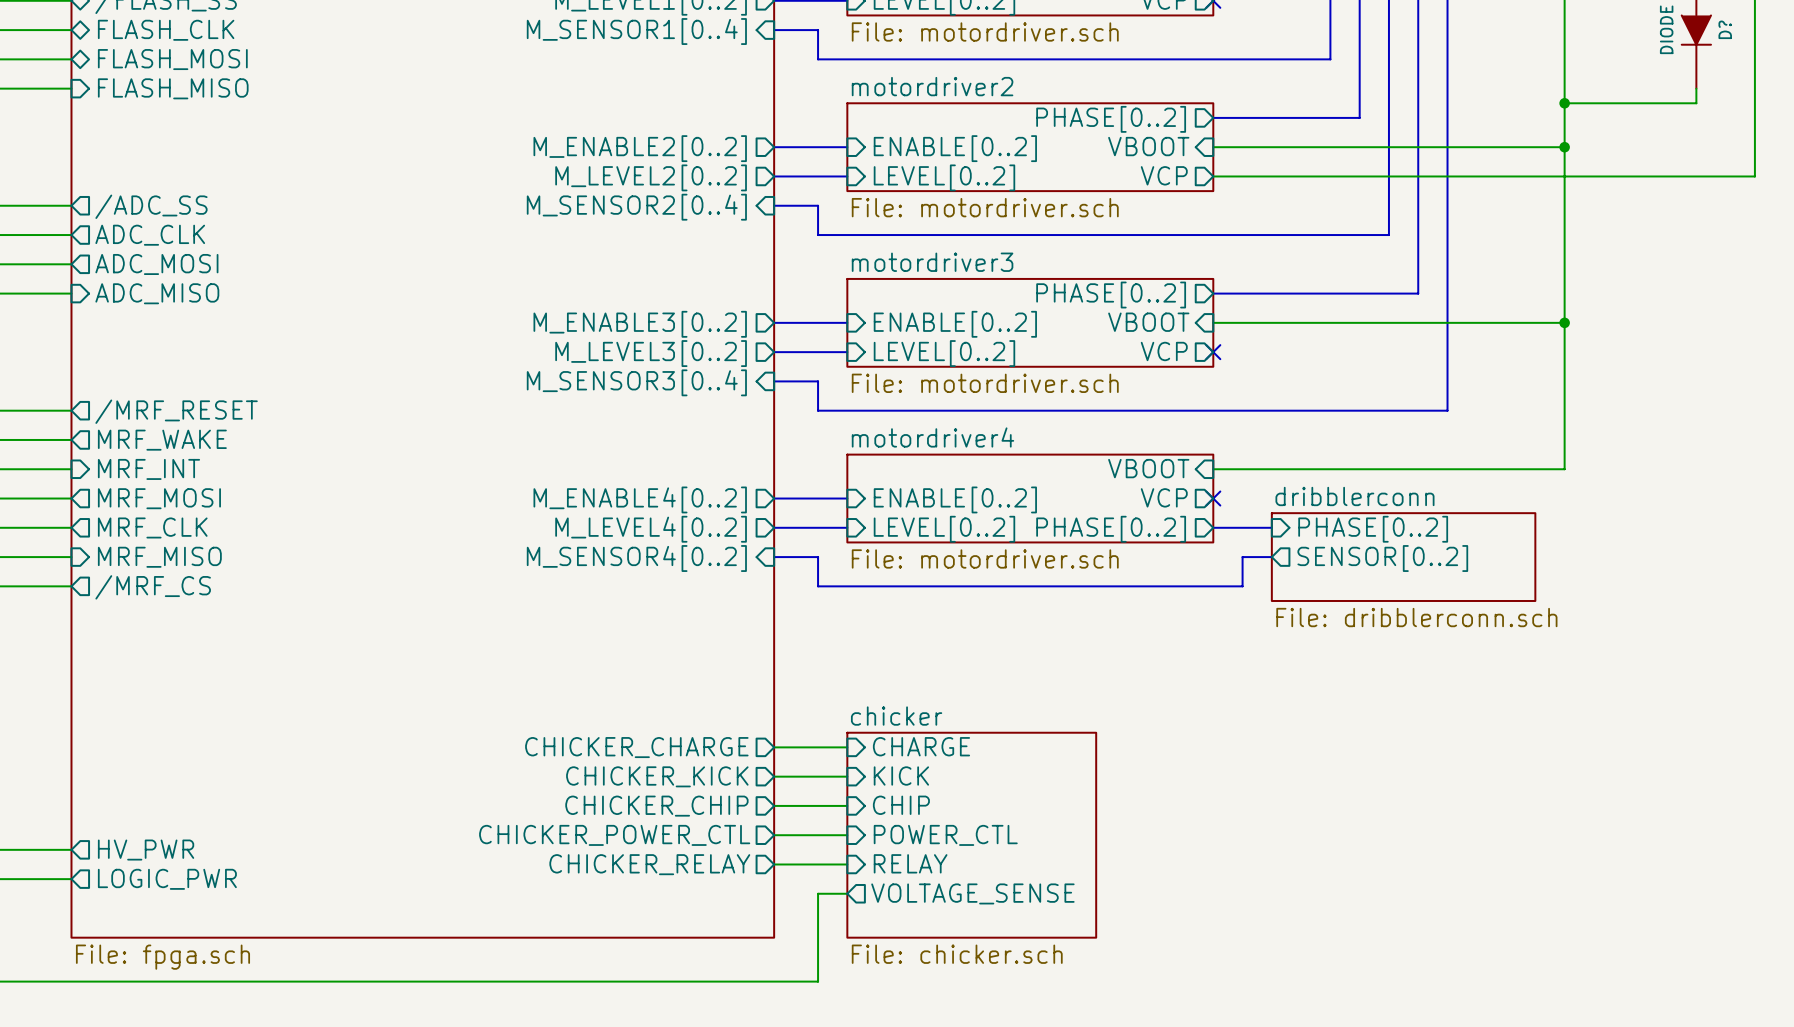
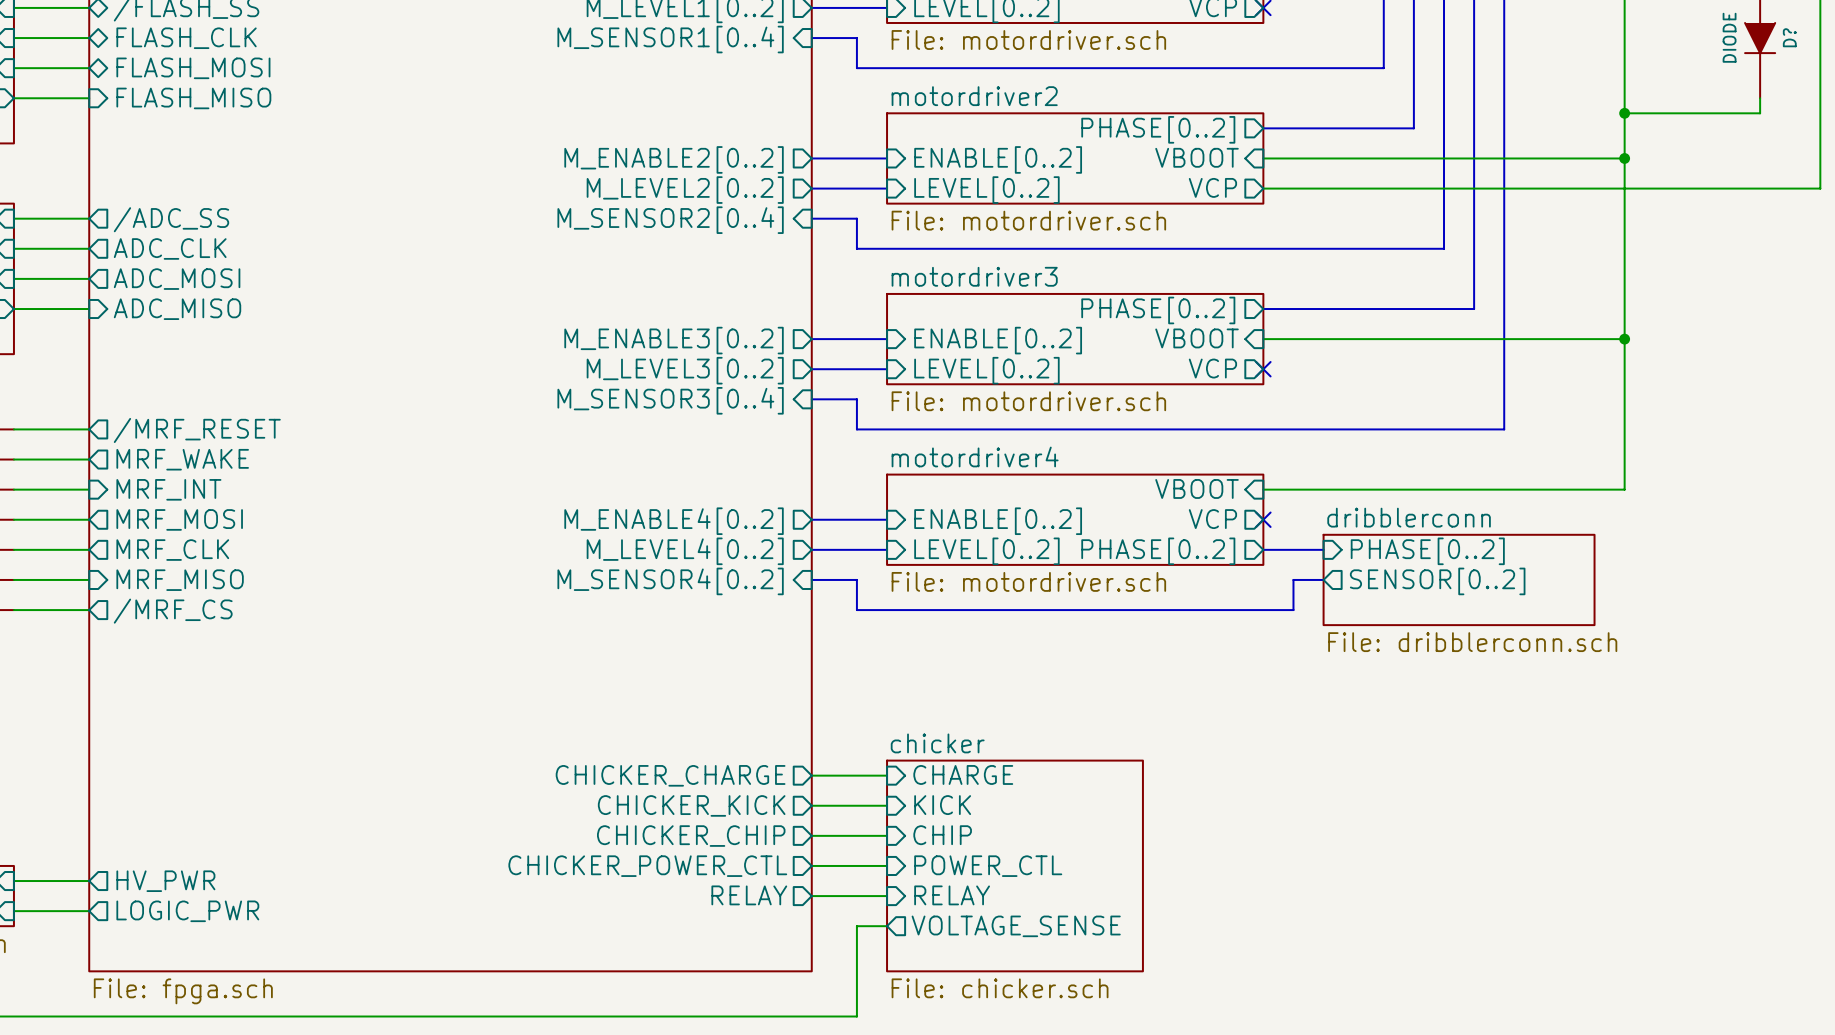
sheet pin: CHICKER_RELAY (649, 864) -> RELAY (749, 895)

